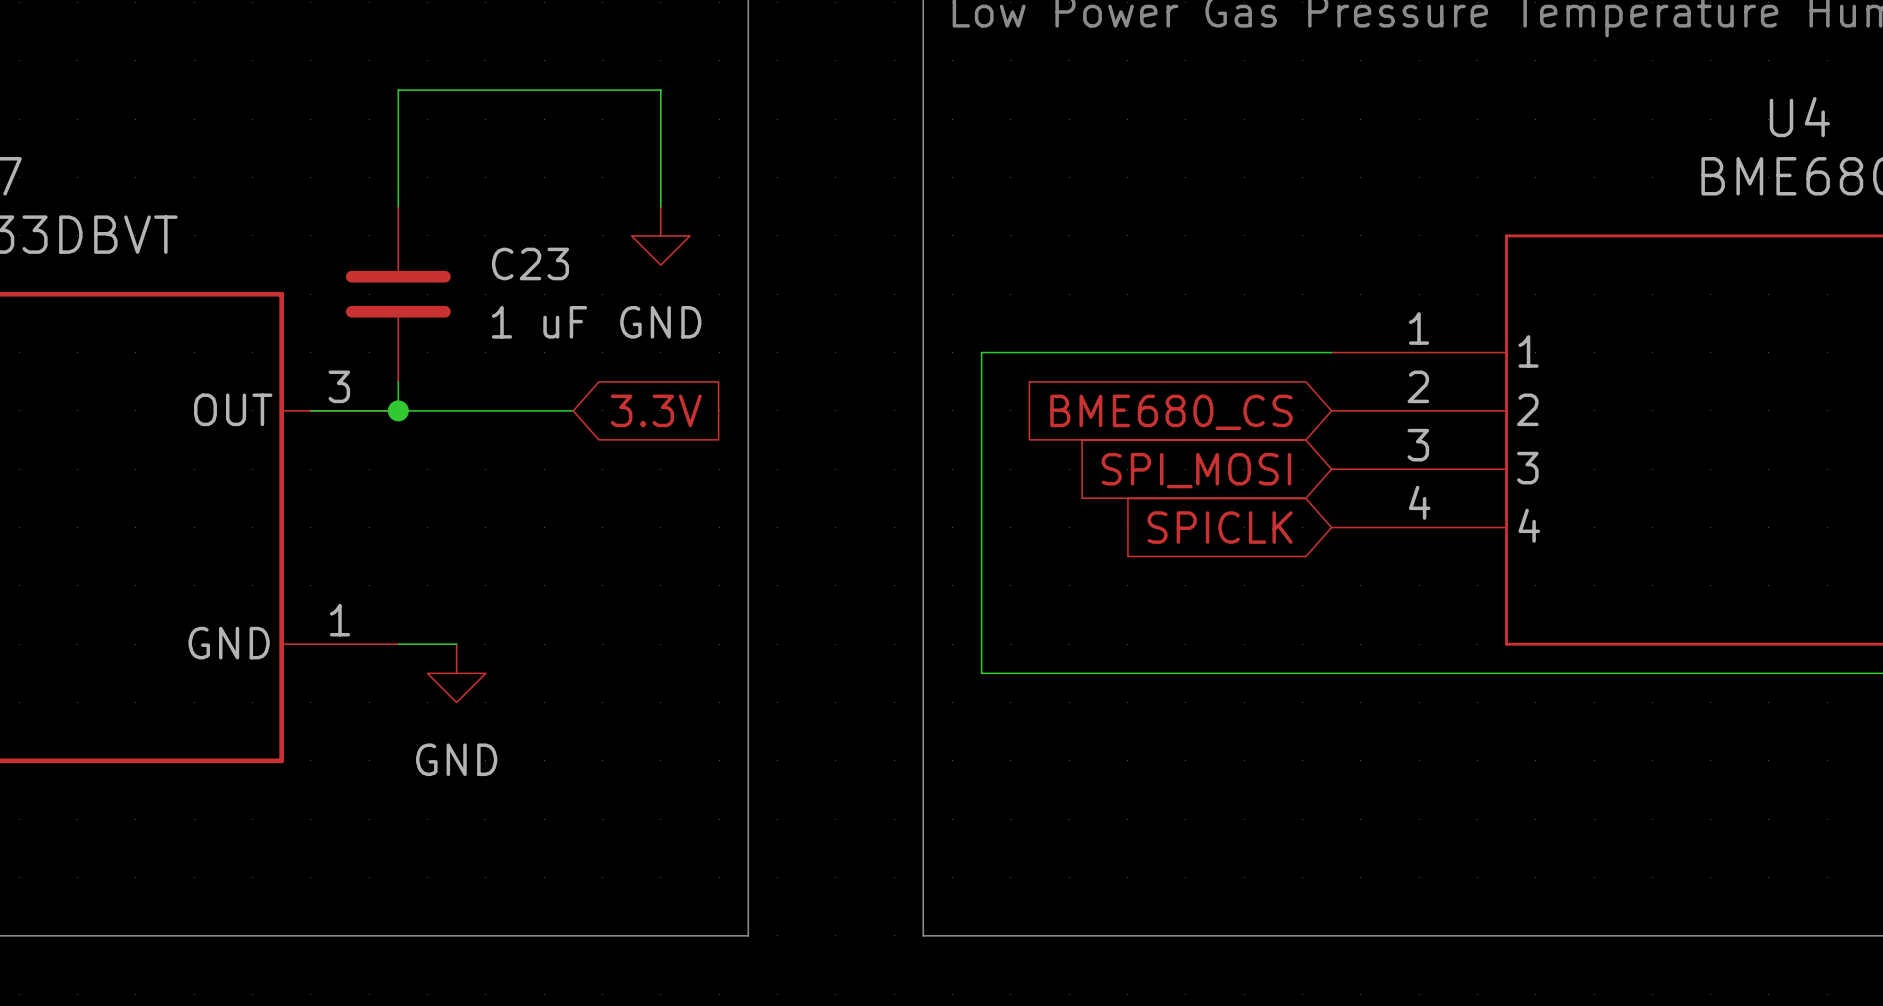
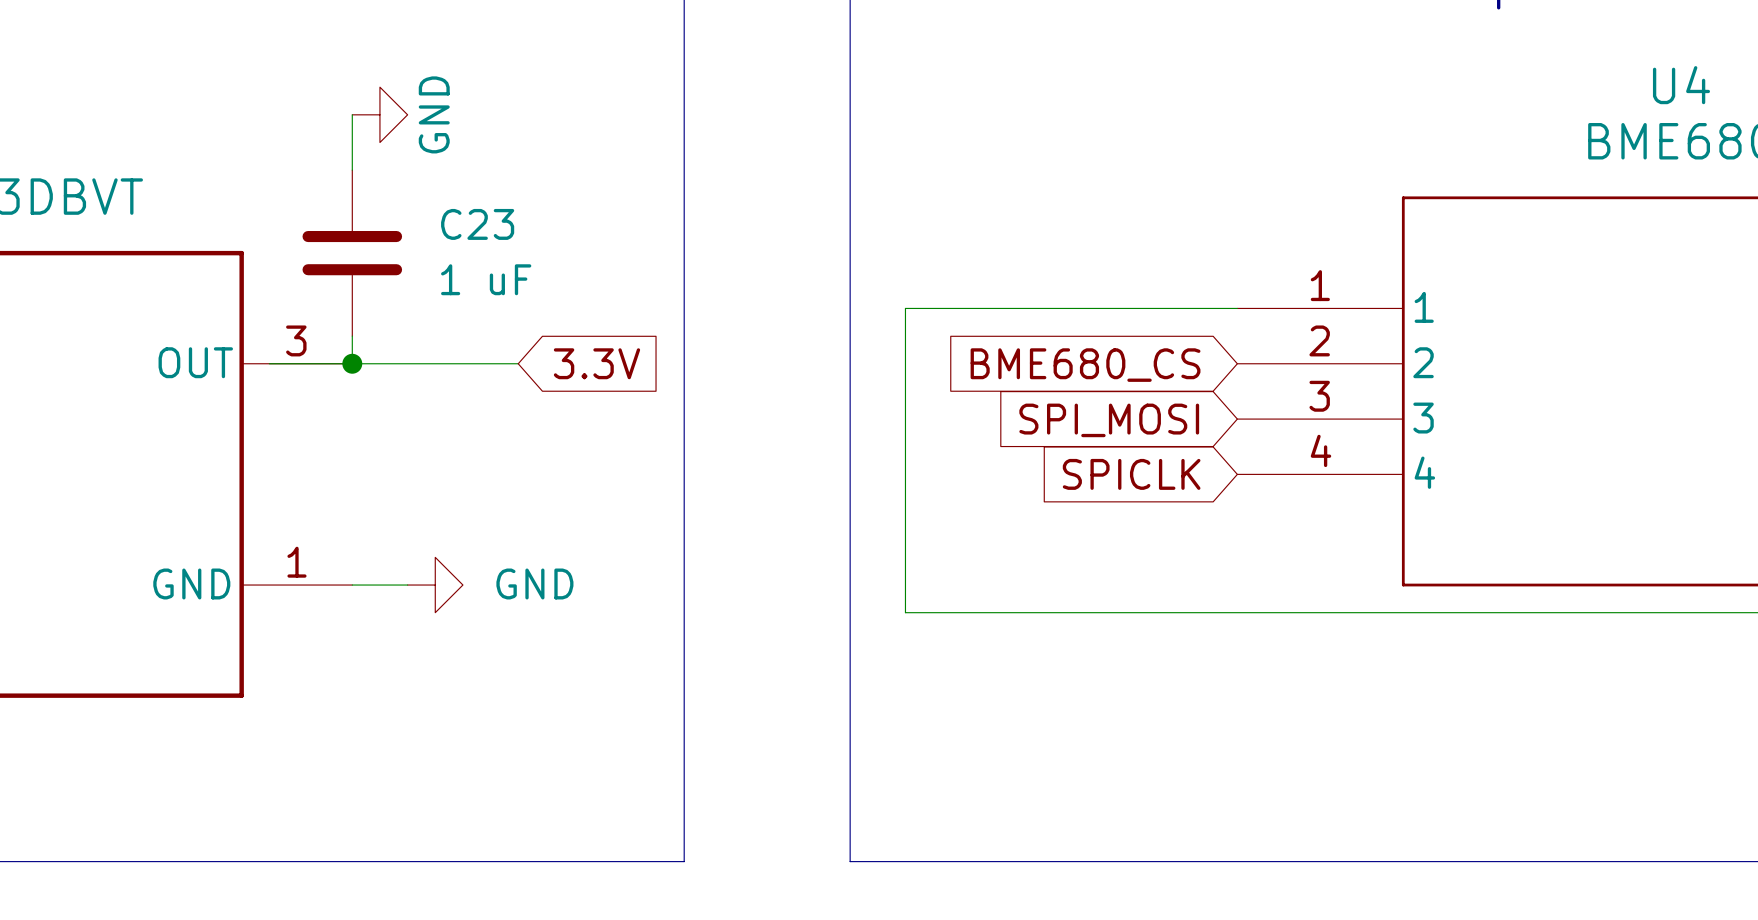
wire: (398, 148) (398, 90) (660, 90) (660, 206) -> none
power symbol: none -> GND (379, 114)
power symbol: GND (660, 235) -> none
power symbol rotation: 0° (456, 673) -> 90° counterclockwise (435, 585)
power symbol position: GND (456, 673) -> GND (435, 585)

